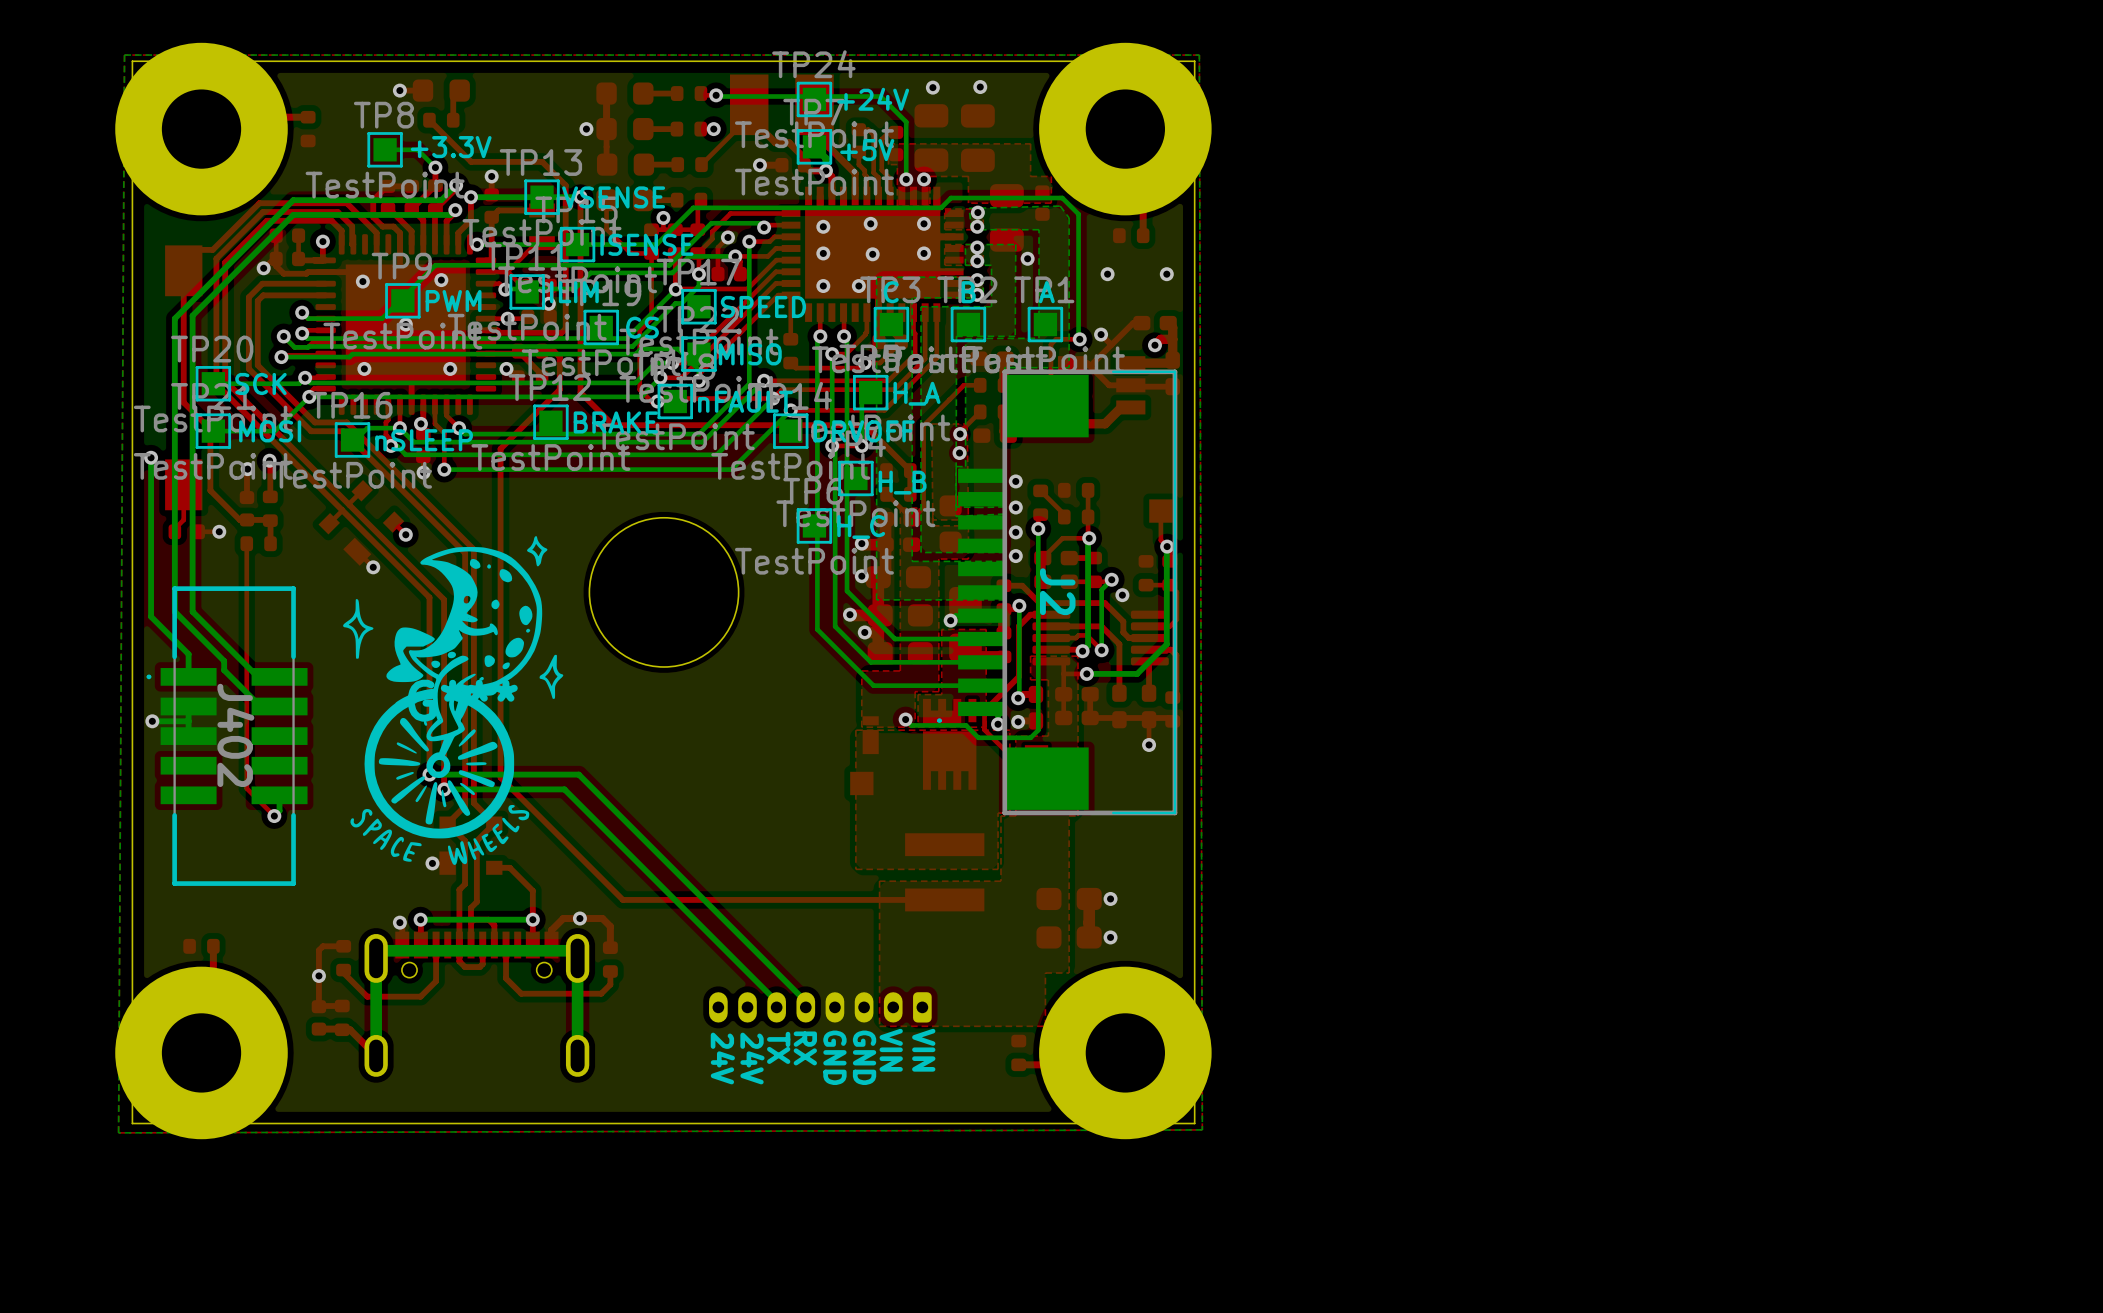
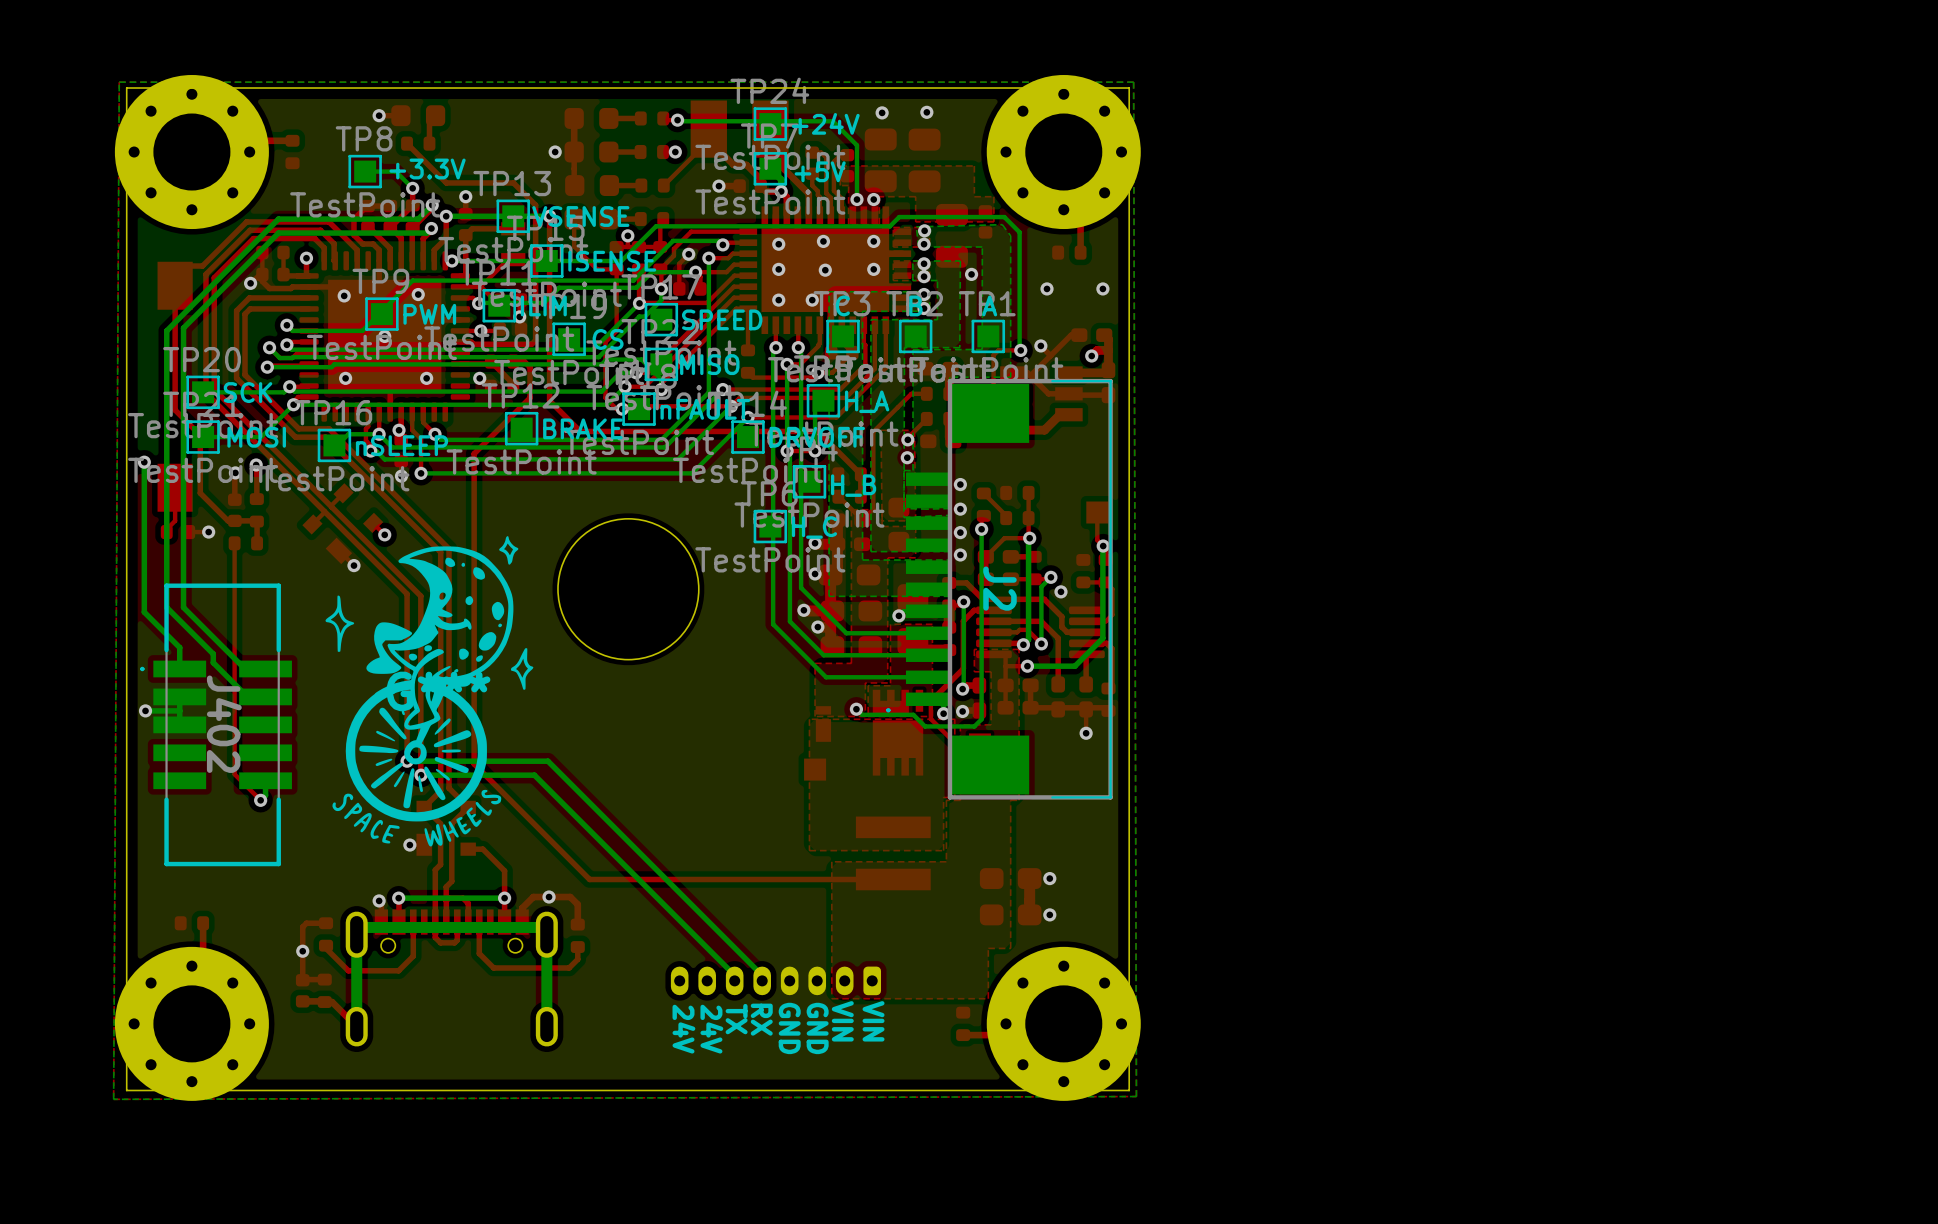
part footprint: [115, 42, 288, 216] -> [114, 75, 269, 230]
part footprint: [1039, 42, 1212, 216] -> [986, 75, 1141, 230]
part footprint: [115, 966, 288, 1140] -> [114, 946, 269, 1101]
part footprint: [1039, 966, 1212, 1140] -> [986, 946, 1141, 1101]

